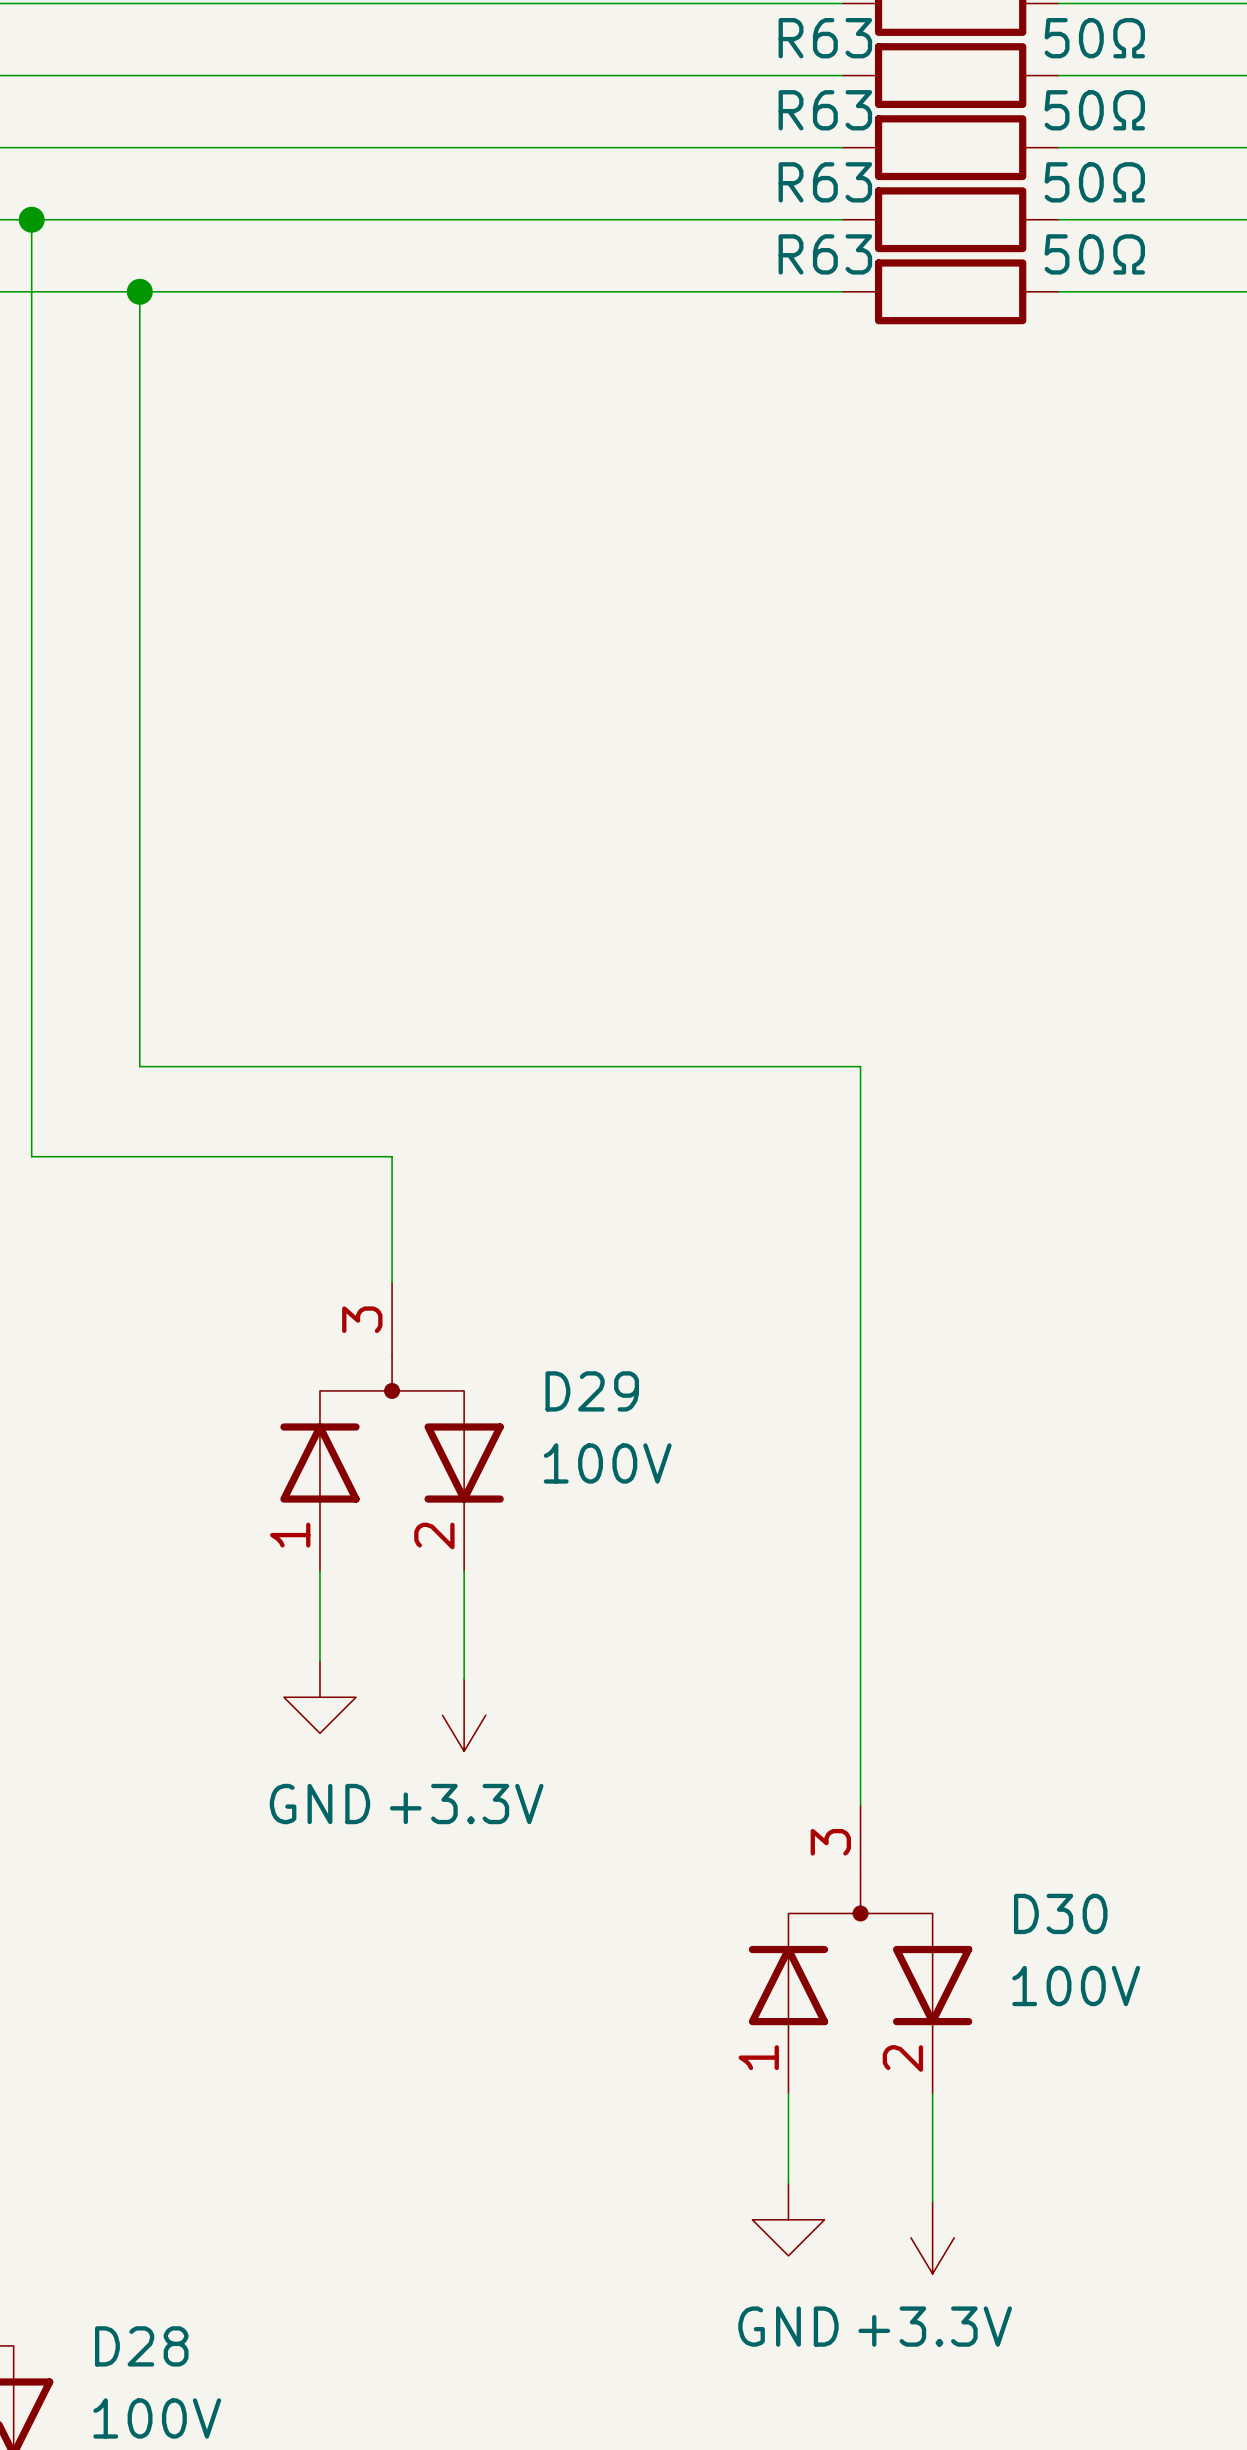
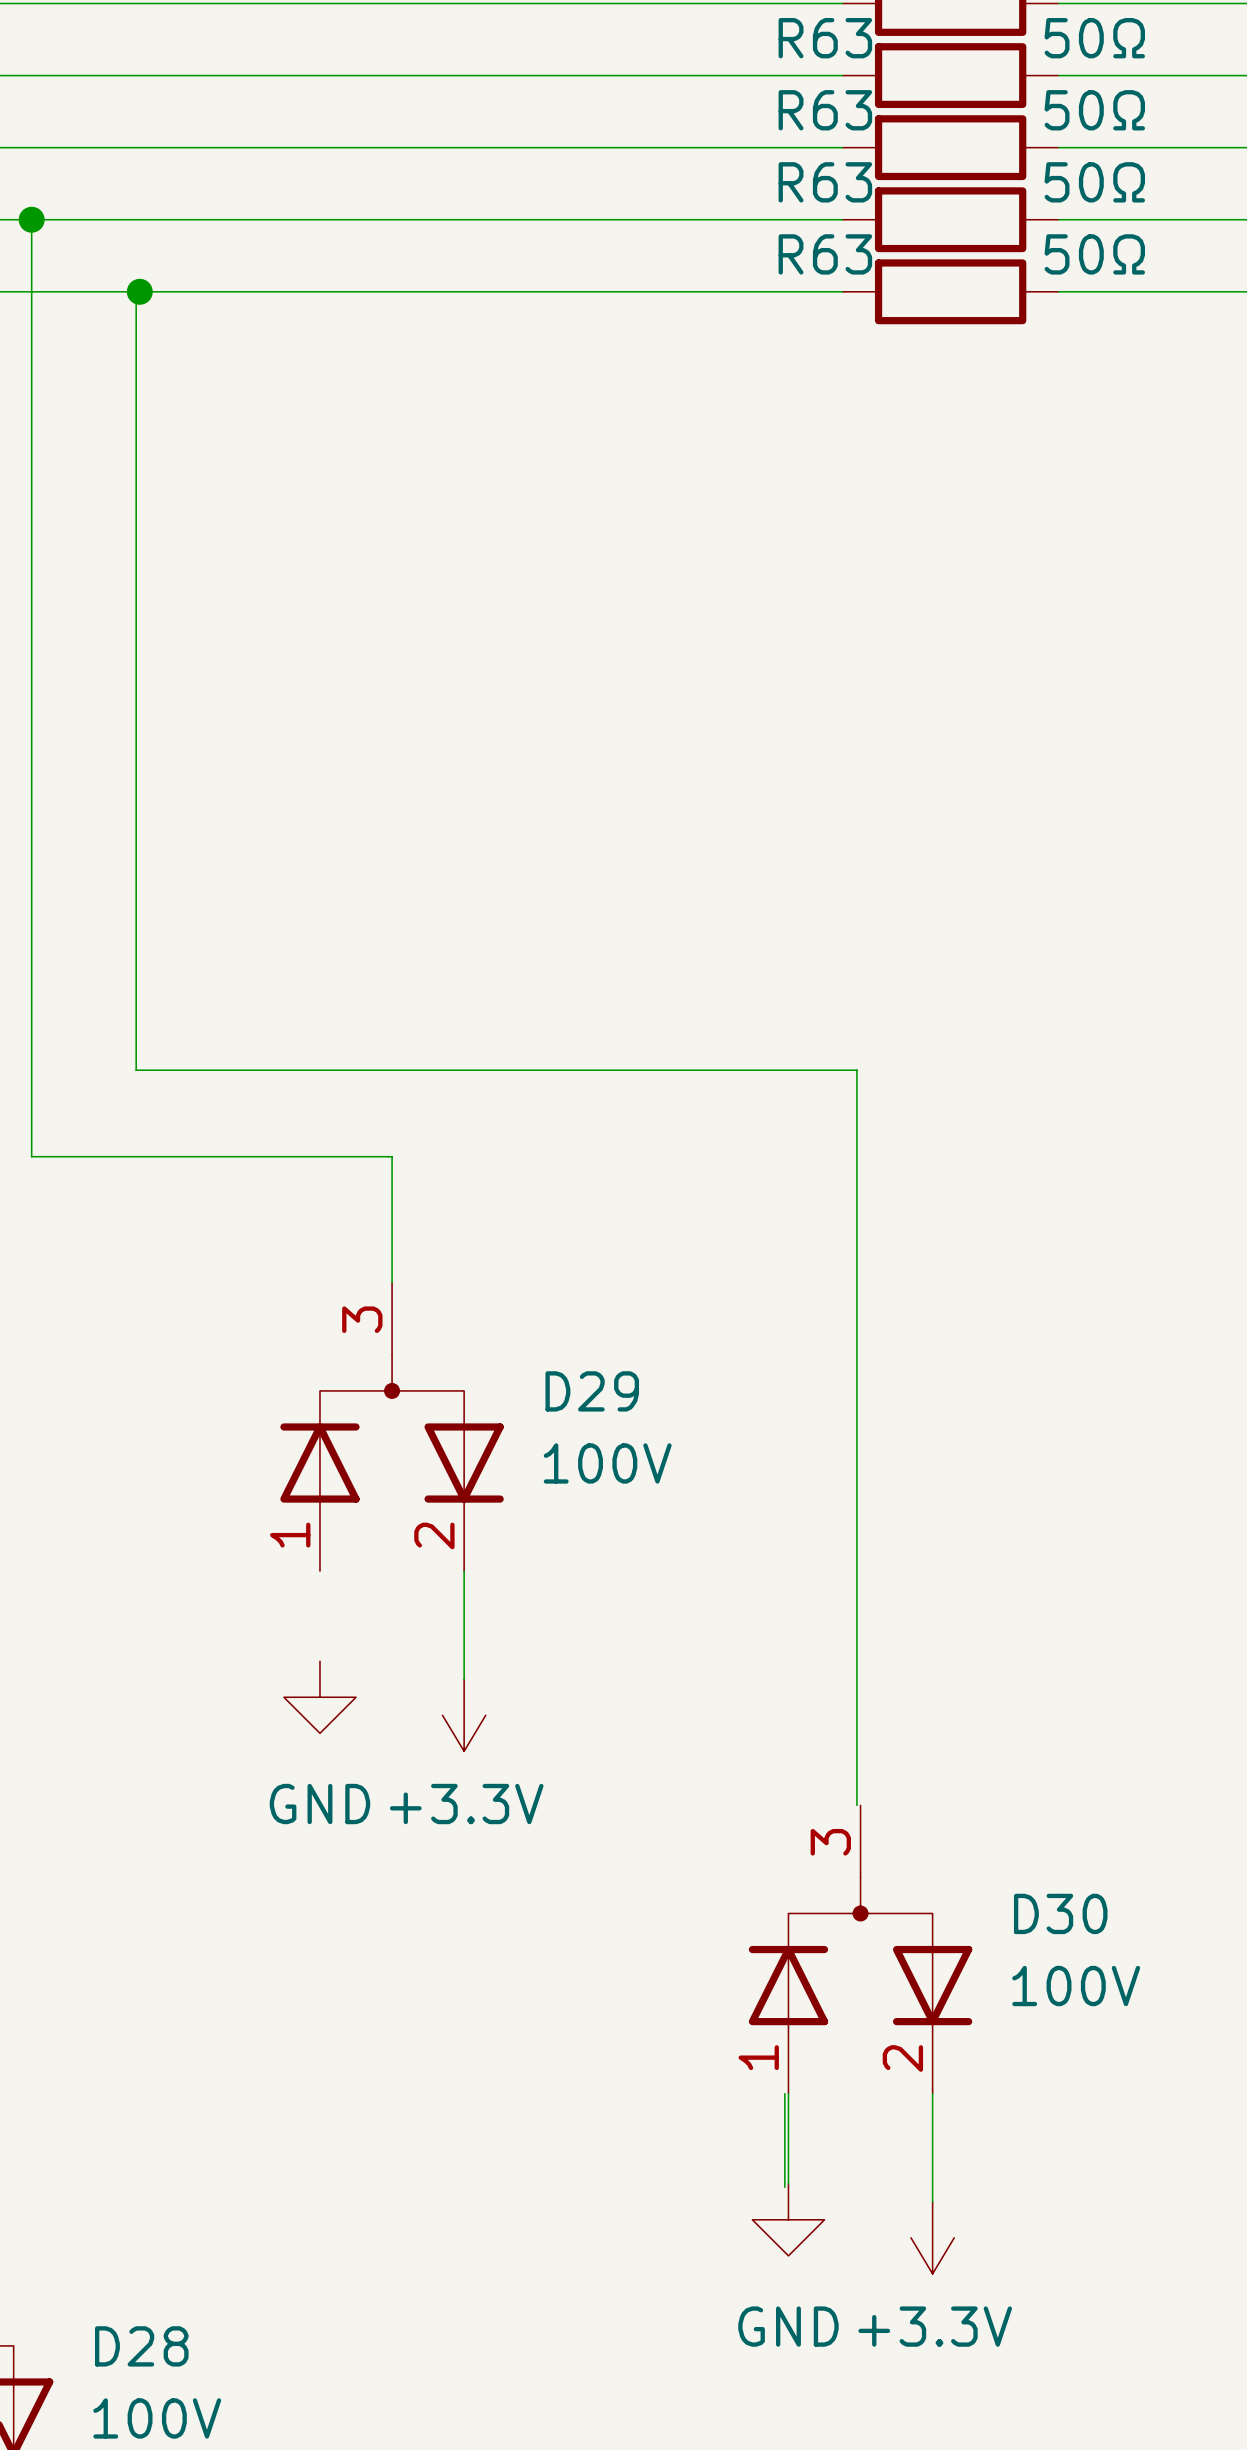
wire: none -> (136, 291) (136, 1070) (856, 1070) (856, 1805)
wire: (139, 291) (139, 1066) (860, 1066) (860, 1805) -> none
wire: (319, 1571) (319, 1661) -> none
wire: none -> (784, 2093) (784, 2187)

